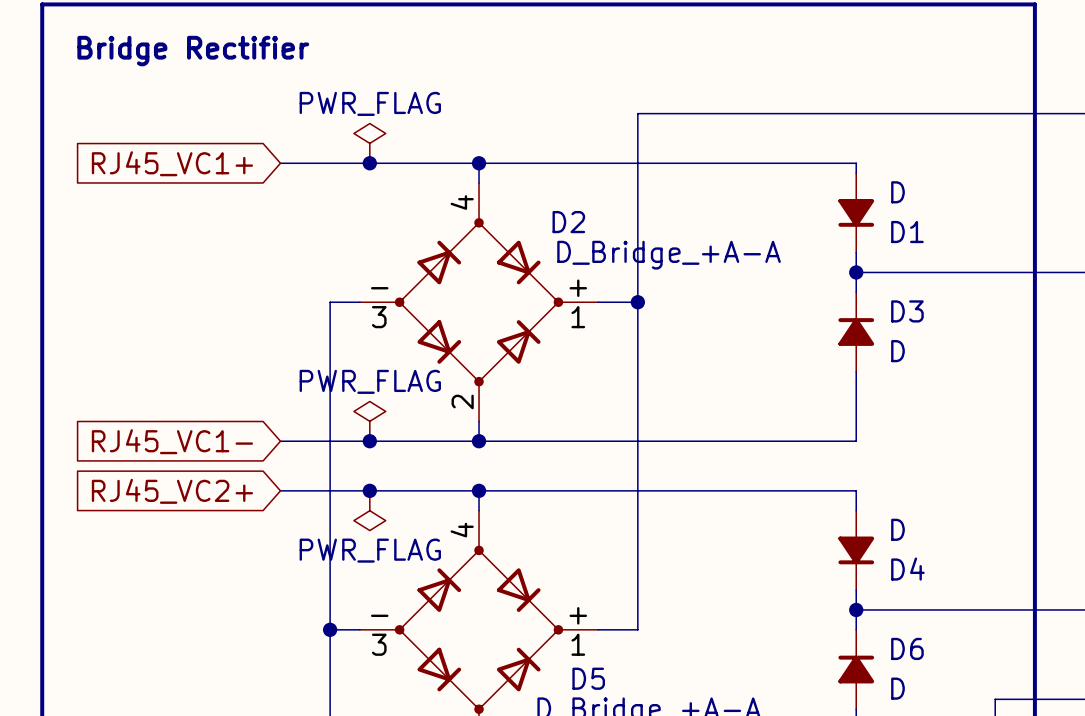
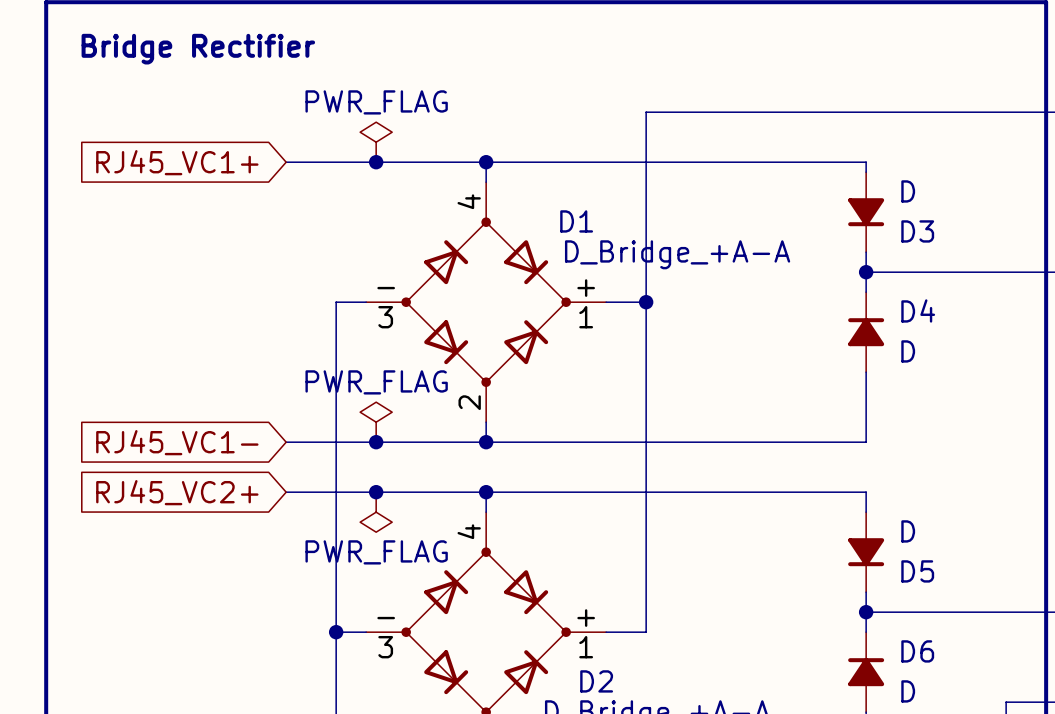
D2 name: D2 (568, 222) -> D1 (576, 221)
D1 name: D1 (907, 232) -> D3 (917, 231)
D3 name: D3 (907, 311) -> D4 (918, 310)
D4 name: D4 (907, 569) -> D5 (917, 571)
D5 name: D5 (588, 678) -> D2 (596, 681)

